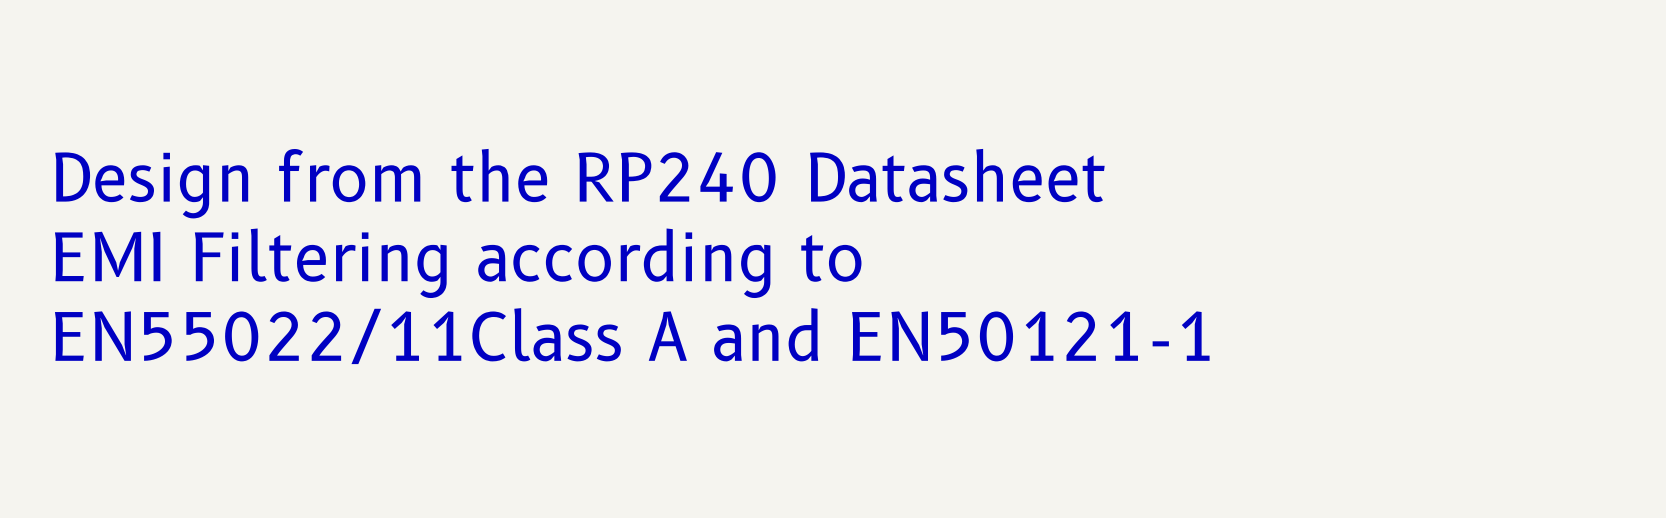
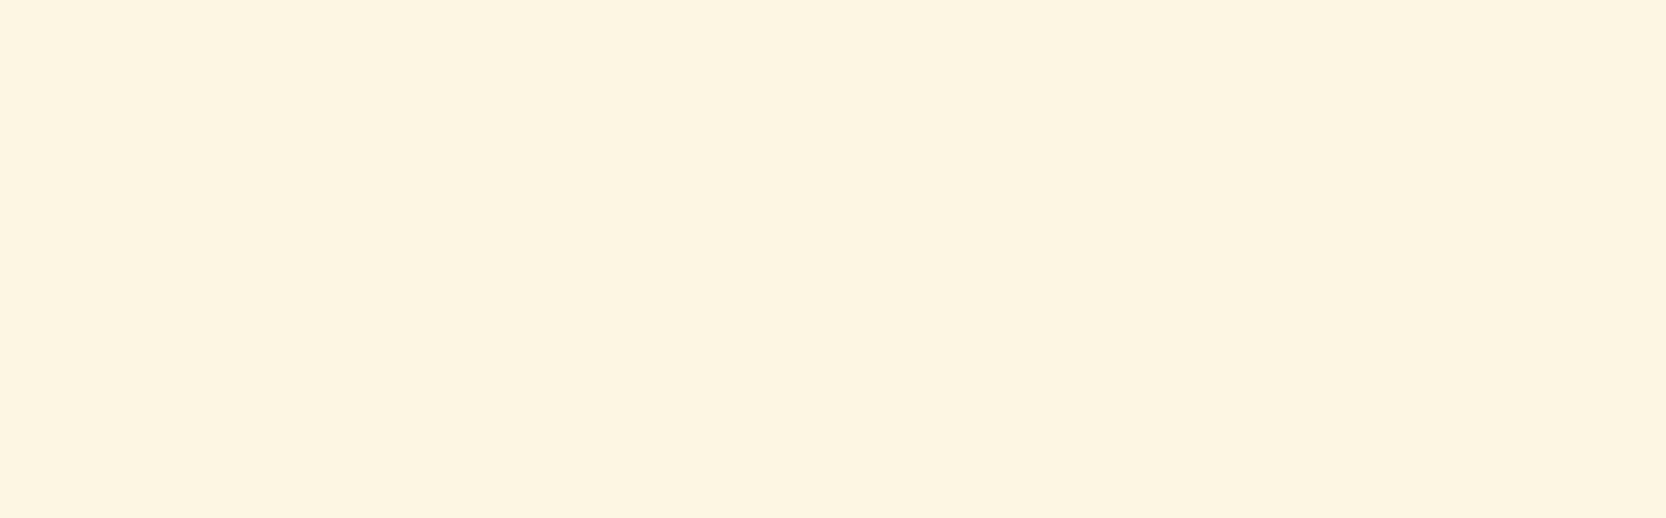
text: Design from the RP240 Datasheet (579, 183) -> none
text: EMI Filtering according to (458, 263) -> none
text: EN55022/11Class A and EN50121-1 (632, 336) -> none

